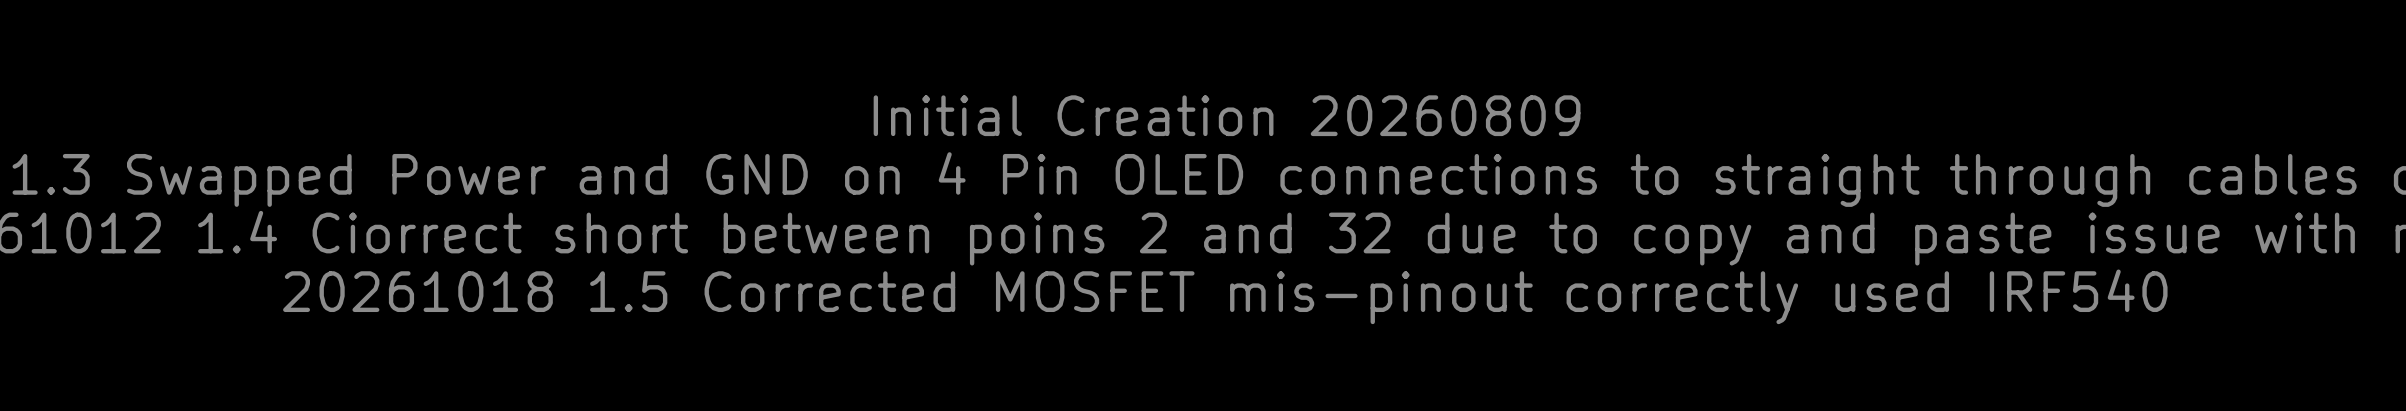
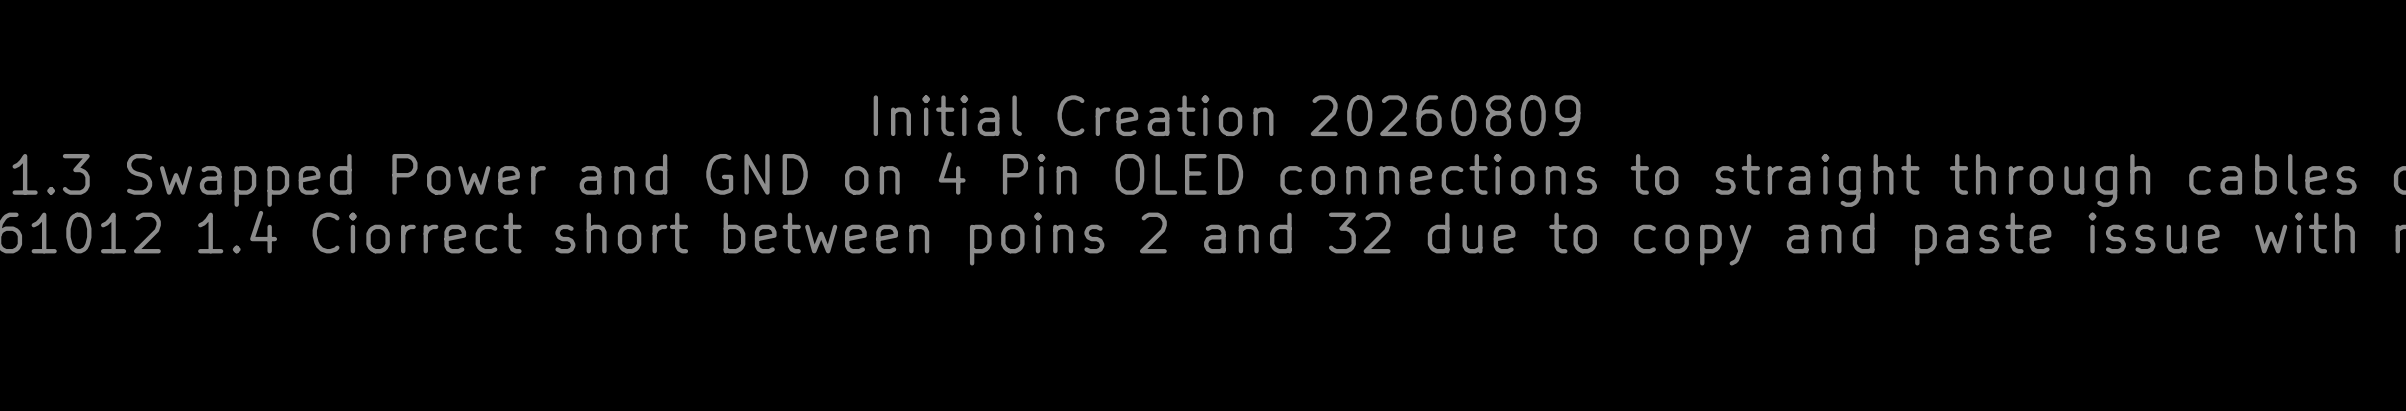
text: 20261018 1.5 Corrected MOSFET mis-pinout correctly used IRF540 (1225, 296) -> none

